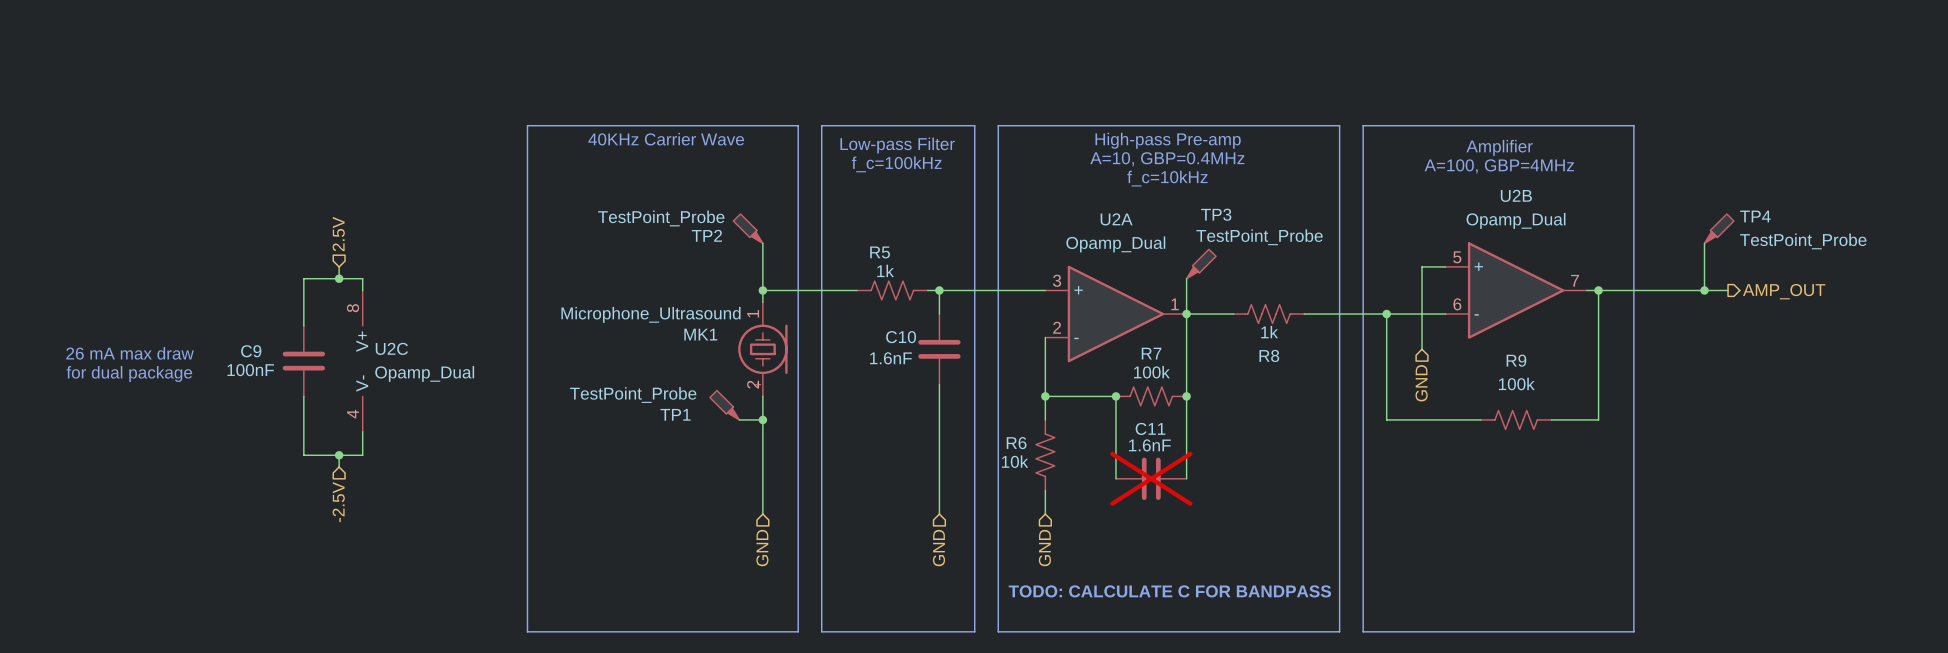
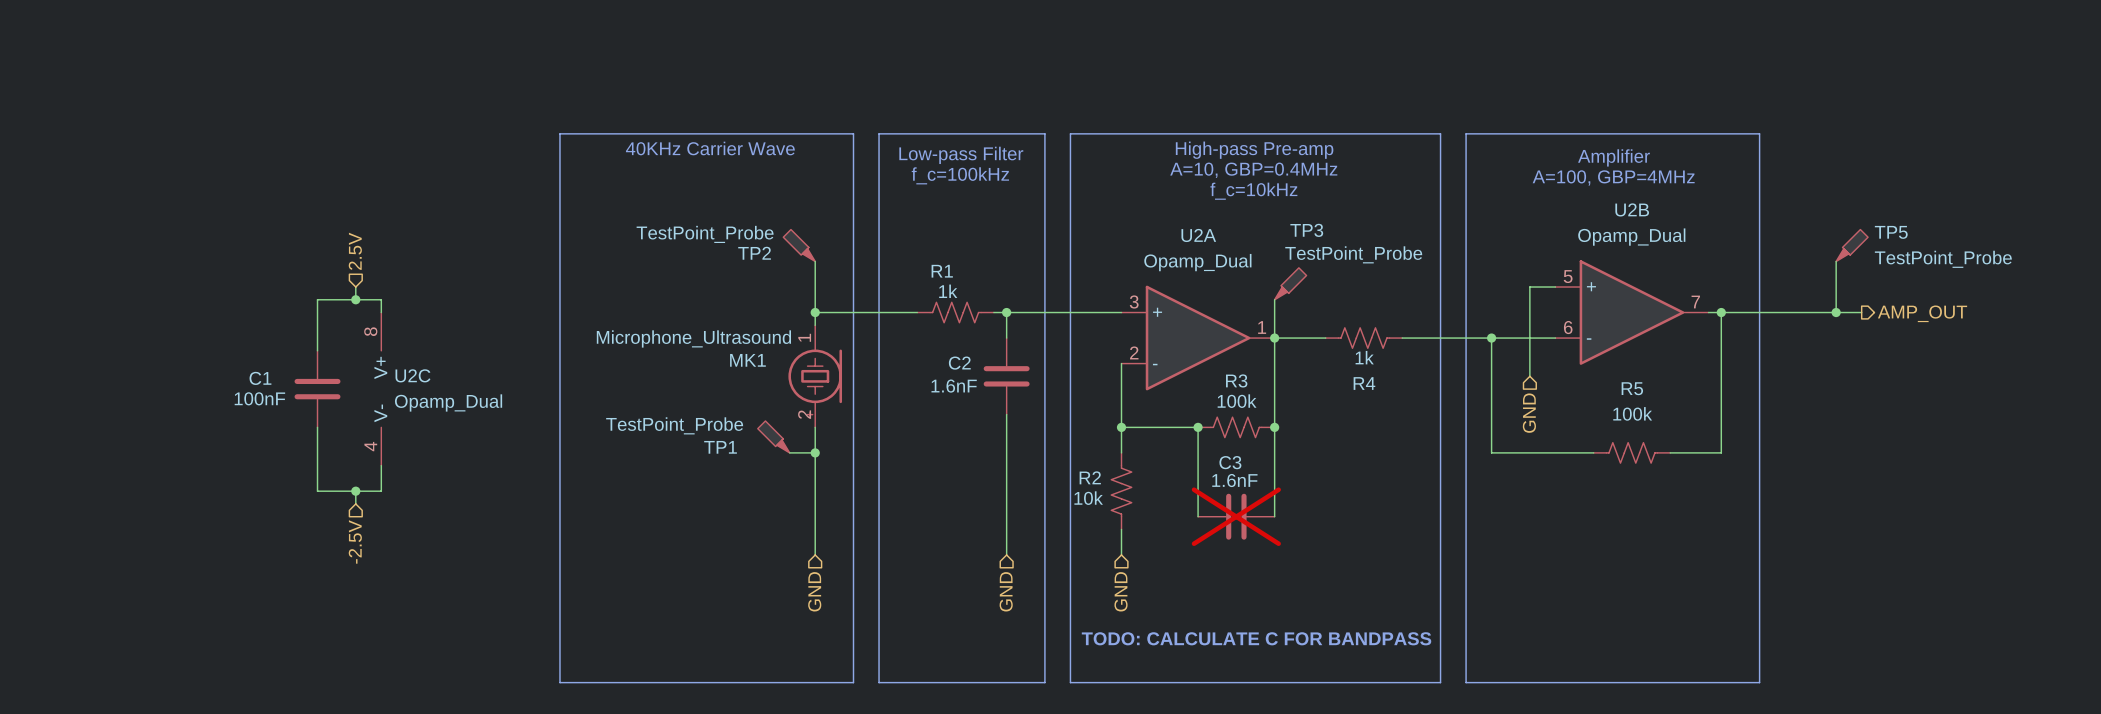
TP4 name: TP4 (1755, 216) -> TP5 (1891, 232)
R5 name: R5 (880, 252) -> R1 (942, 271)
C10 name: C10 (901, 337) -> C2 (959, 363)
C9 name: C9 (251, 351) -> C1 (260, 378)
text: 26 mA max draw (130, 353) -> none
R7 name: R7 (1151, 353) -> R3 (1236, 380)
R8 name: R8 (1269, 355) -> R4 (1364, 383)
R9 name: R9 (1516, 360) -> R5 (1632, 388)
text: for dual package (129, 373) -> none
C11 name: C11 (1150, 428) -> C3 (1230, 462)
R6 name: R6 (1016, 443) -> R2 (1090, 477)

